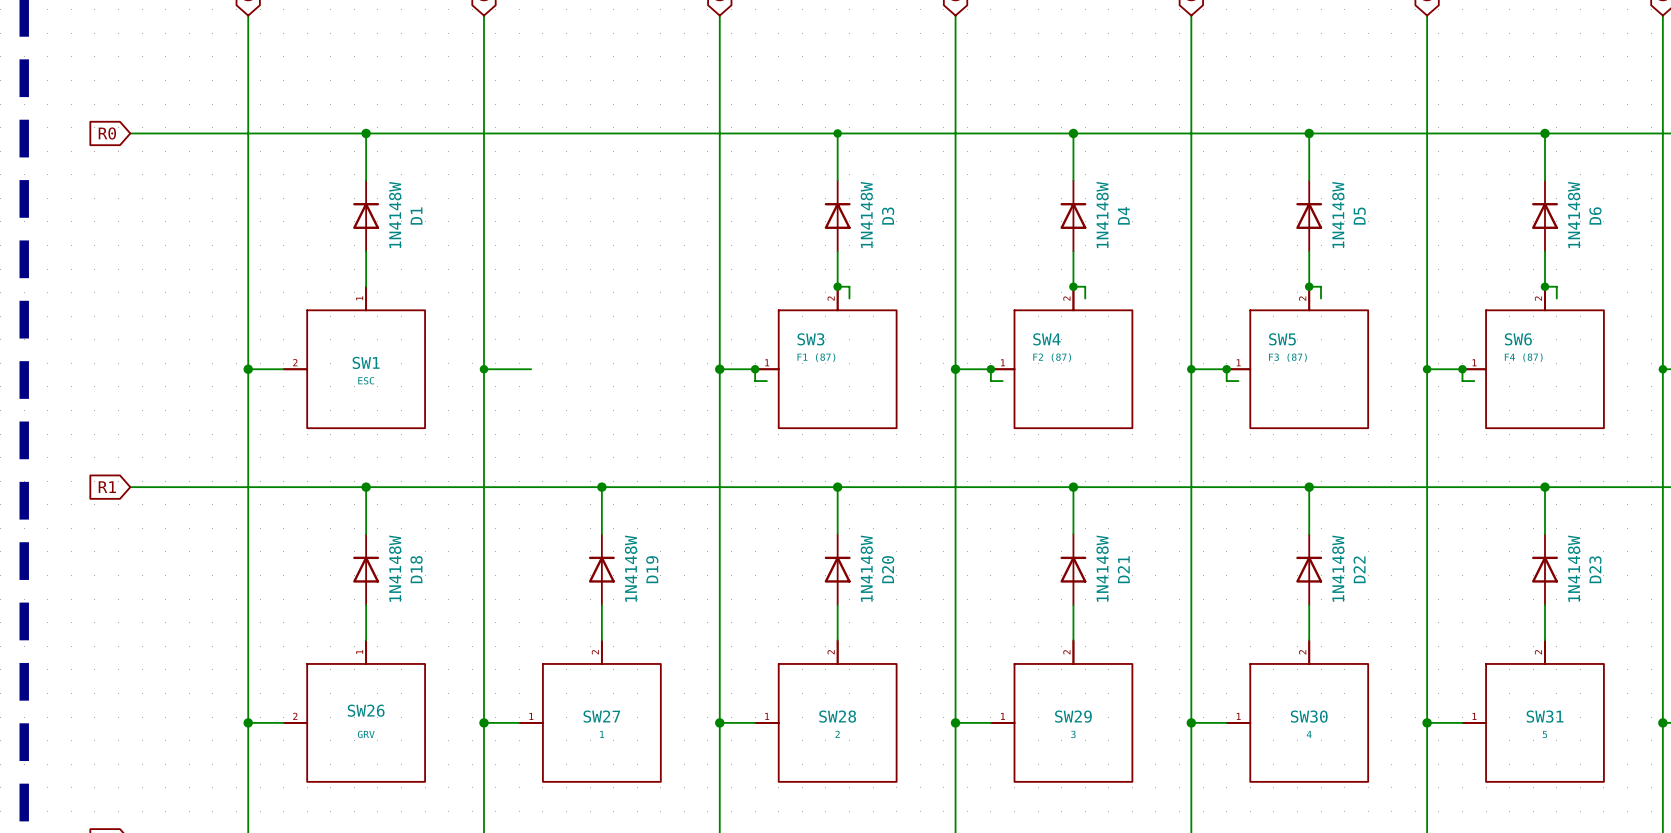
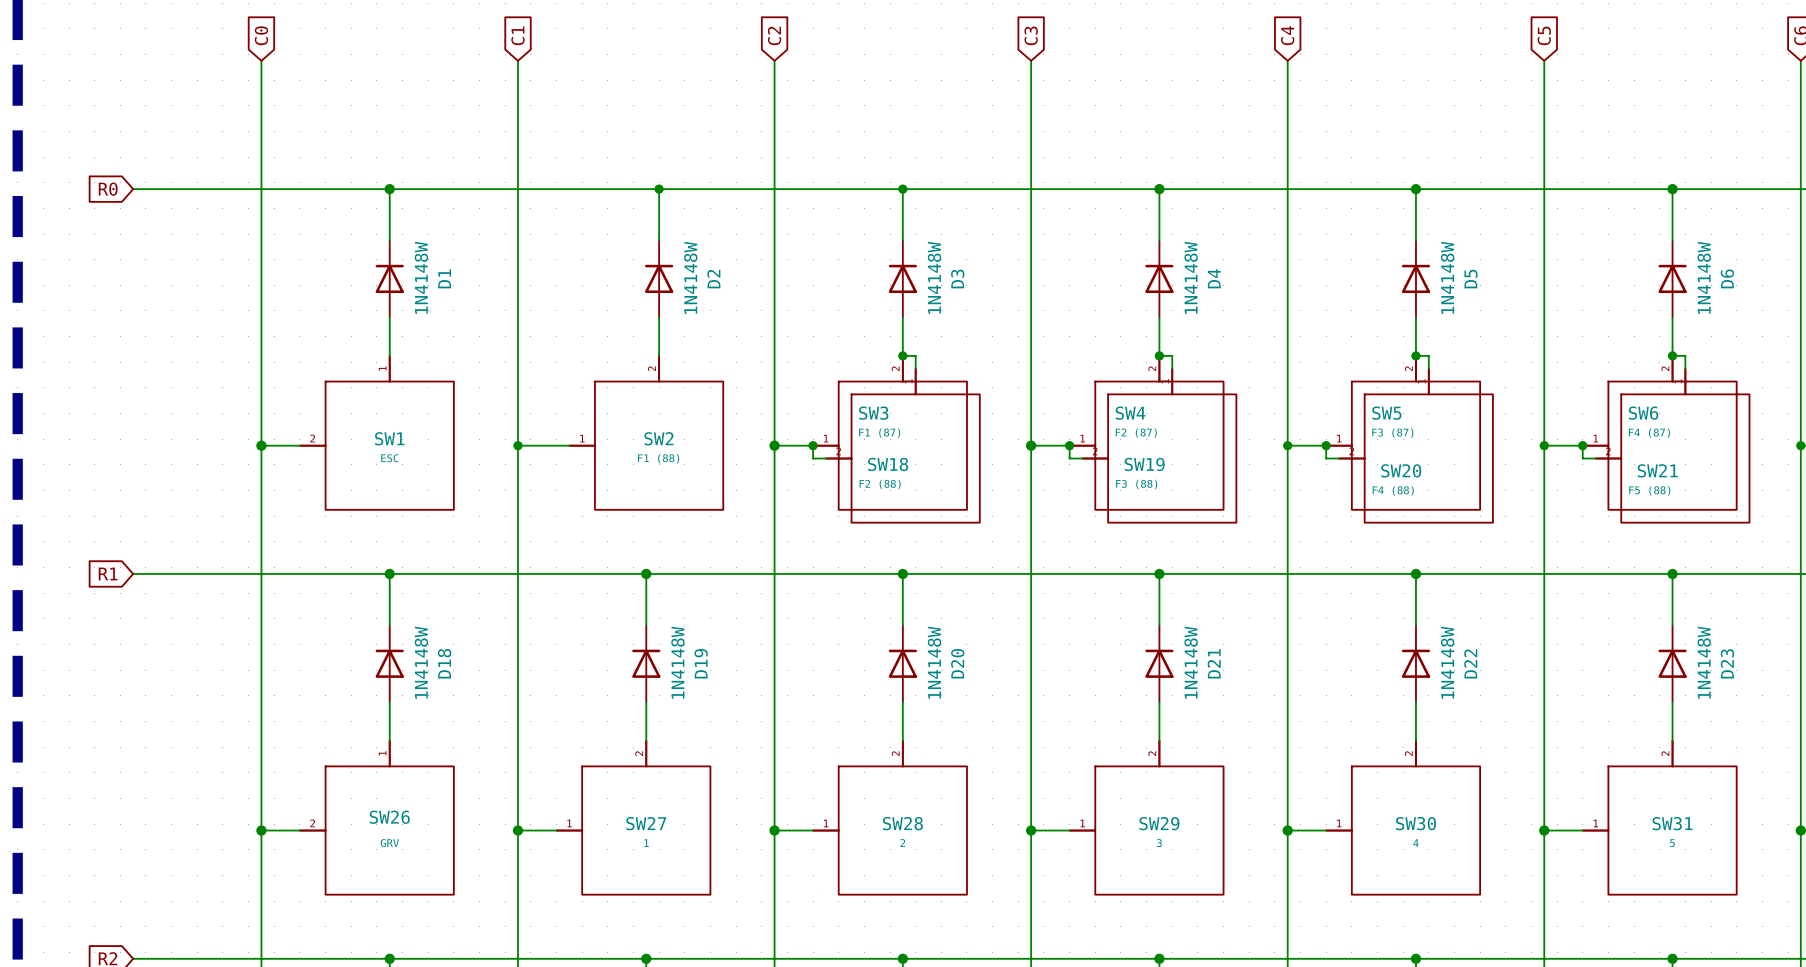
wire: none -> (659, 189) (659, 240)
junction: none -> (659, 189)
D2: none -> 1N4148W (659, 278)
wire: none -> (659, 317) (659, 355)
SW2: none -> (646, 432)
SW18: none -> (902, 445)
SW19: none -> (1159, 445)
SW20: none -> (1415, 445)
SW21: none -> (1672, 445)

